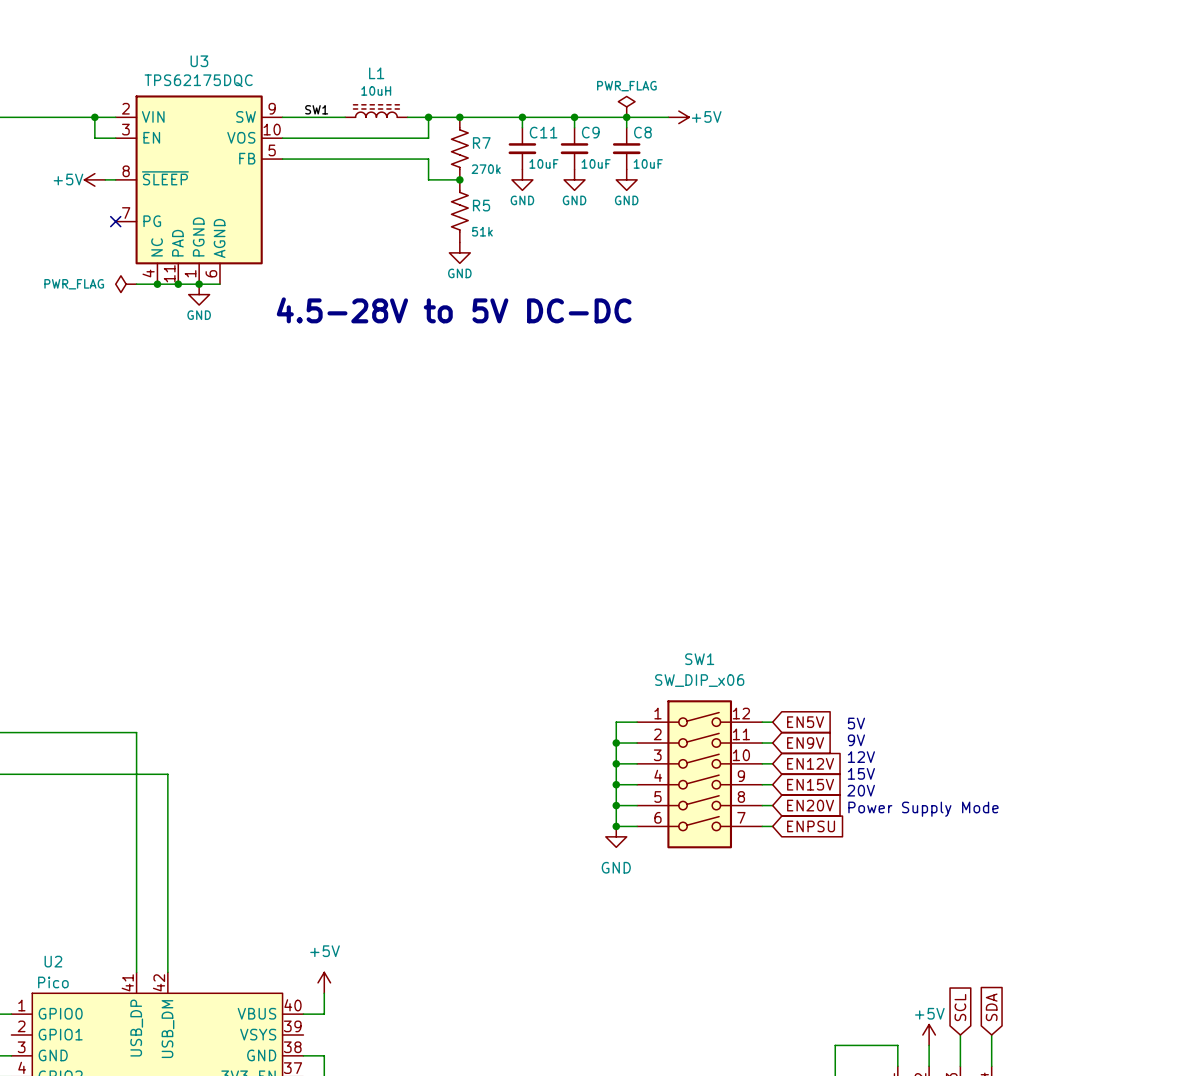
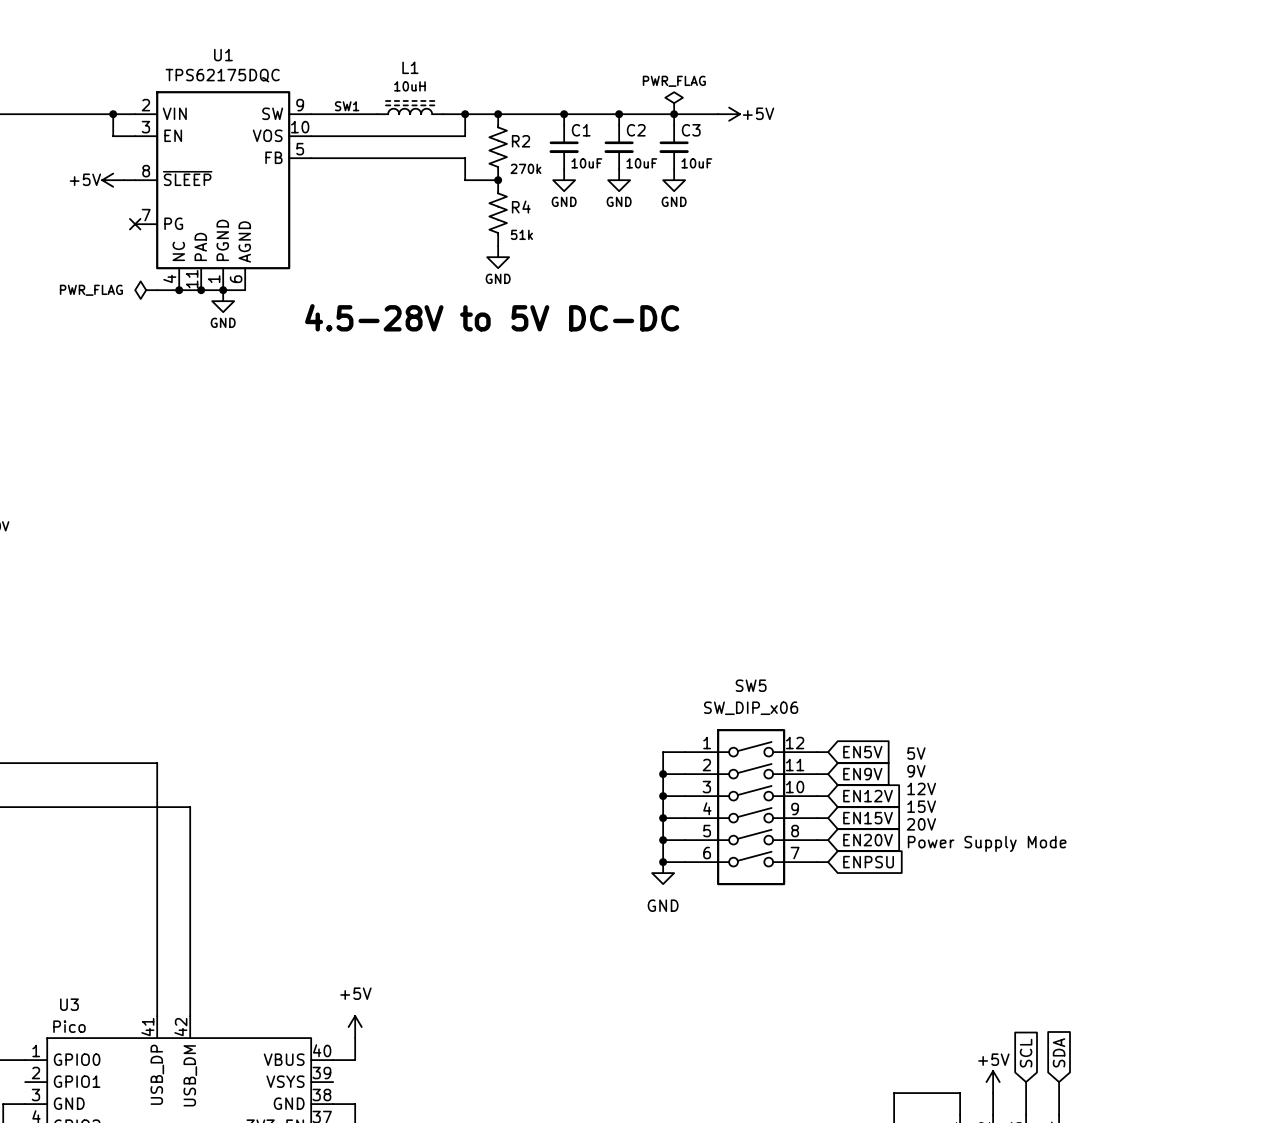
U3 name: U3 (199, 61) -> U1 (223, 55)
C11 name: C11 (543, 132) -> C1 (581, 130)
C9 name: C9 (590, 132) -> C2 (636, 130)
C8 name: C8 (642, 132) -> C3 (691, 130)
R7 name: R7 (481, 143) -> R2 (521, 141)
R5 name: R5 (481, 205) -> R4 (521, 207)
SW1 name: SW1 (699, 659) -> SW5 (751, 685)
U2 name: U2 (53, 961) -> U3 (69, 1004)

